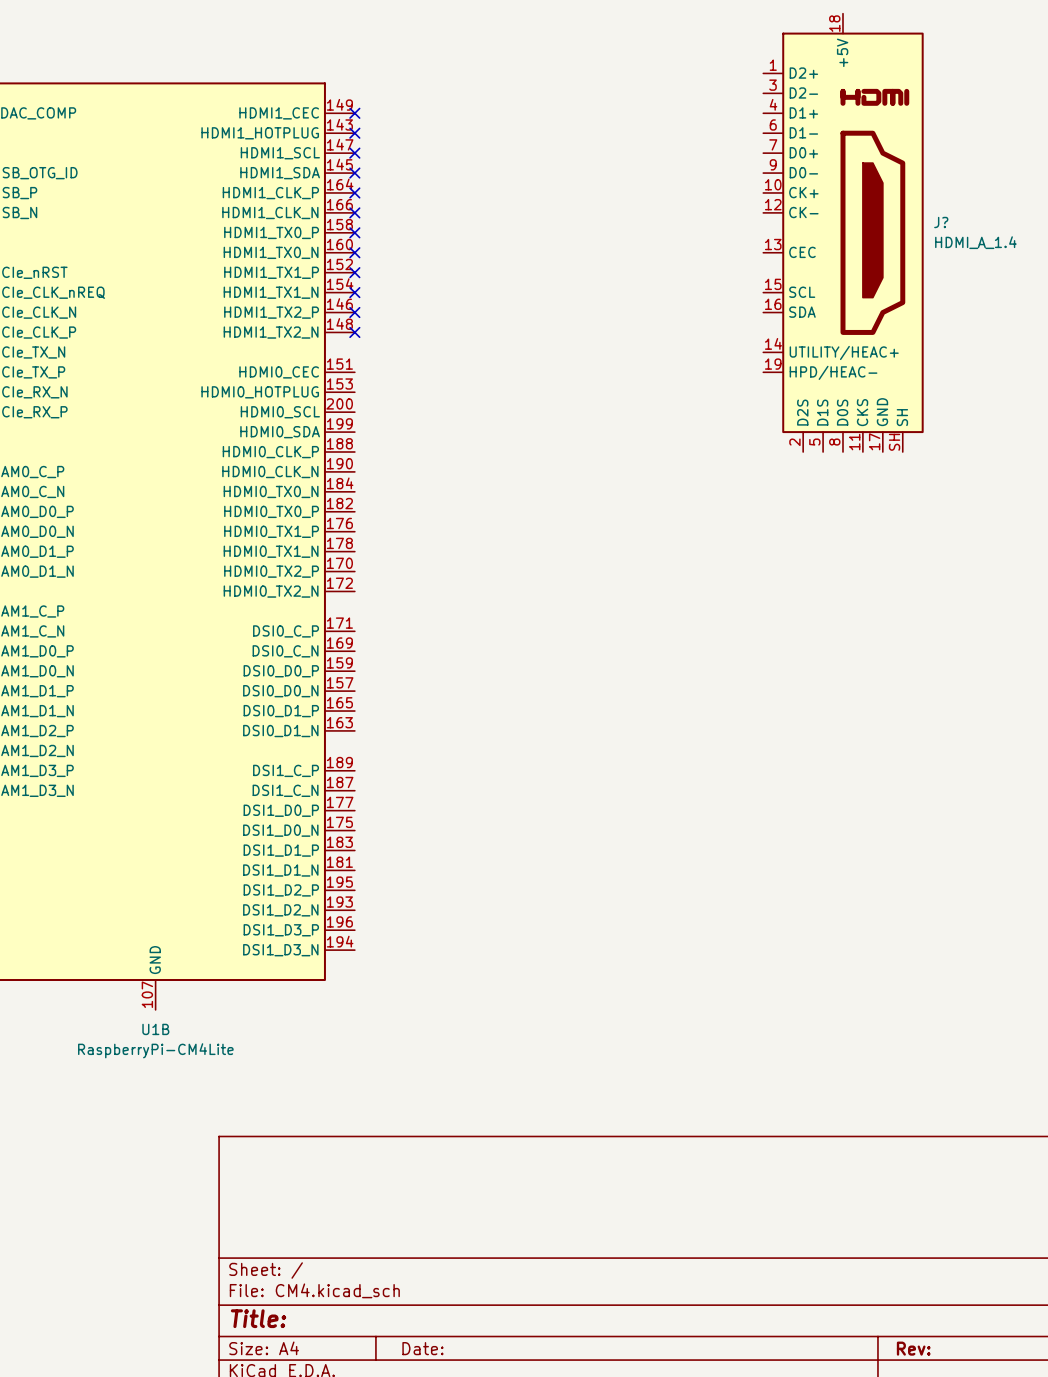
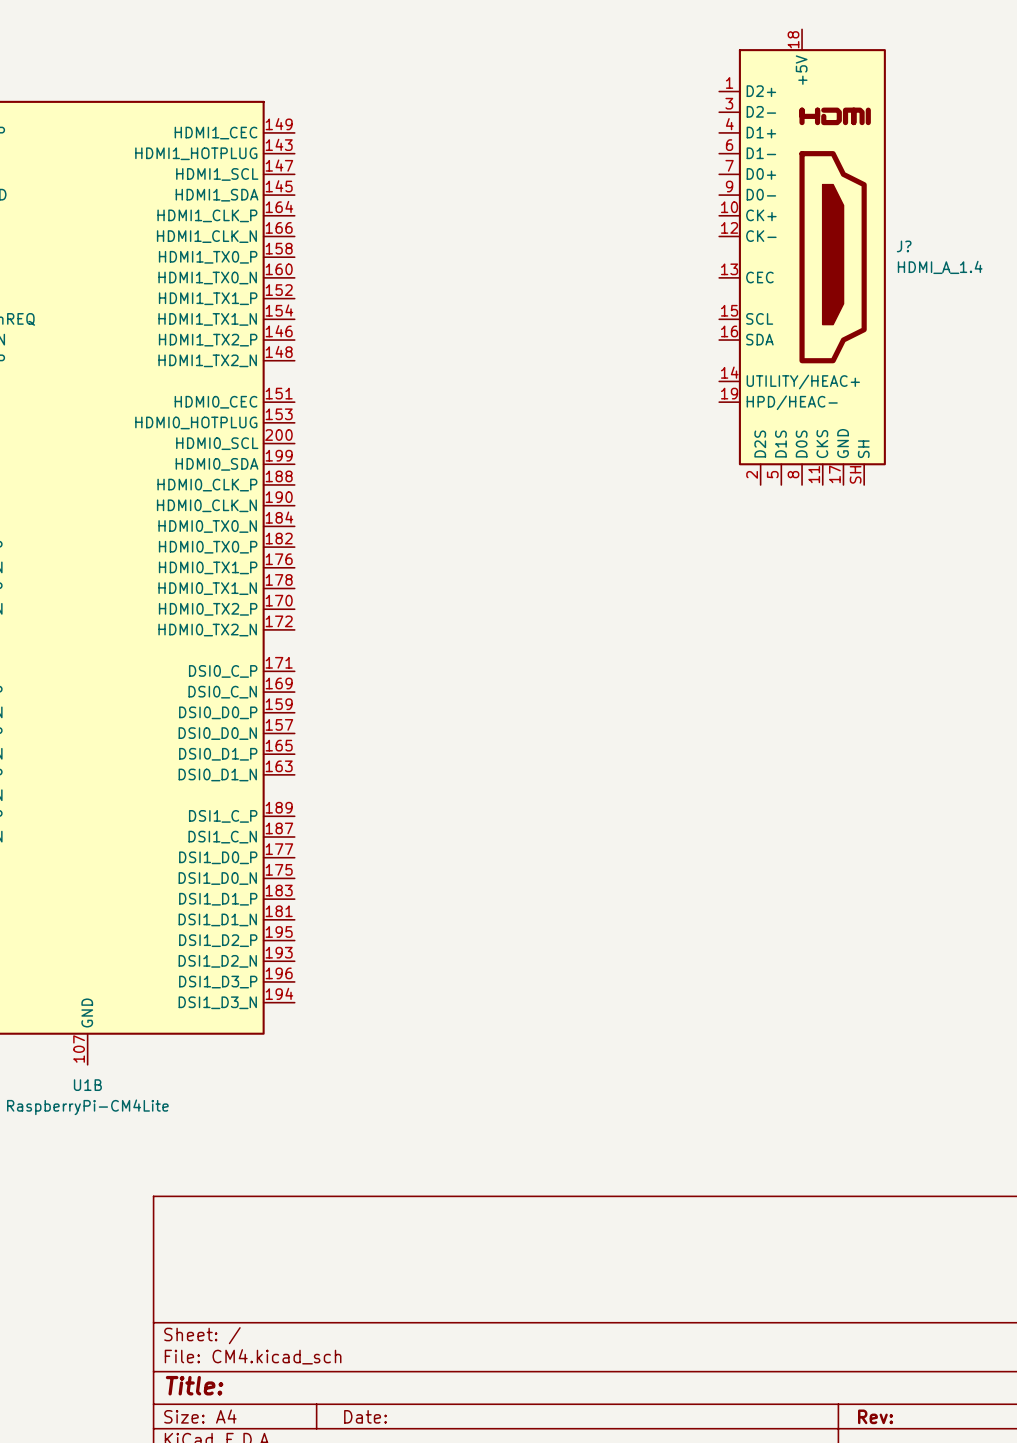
no-connect mark: (354, 113) -> none
no-connect mark: (354, 133) -> none
no-connect mark: (354, 153) -> none
no-connect mark: (354, 173) -> none
no-connect mark: (354, 192) -> none
no-connect mark: (354, 212) -> none
no-connect mark: (354, 232) -> none
no-connect mark: (354, 252) -> none
no-connect mark: (354, 272) -> none
no-connect mark: (354, 292) -> none
no-connect mark: (354, 312) -> none
no-connect mark: (354, 332) -> none

